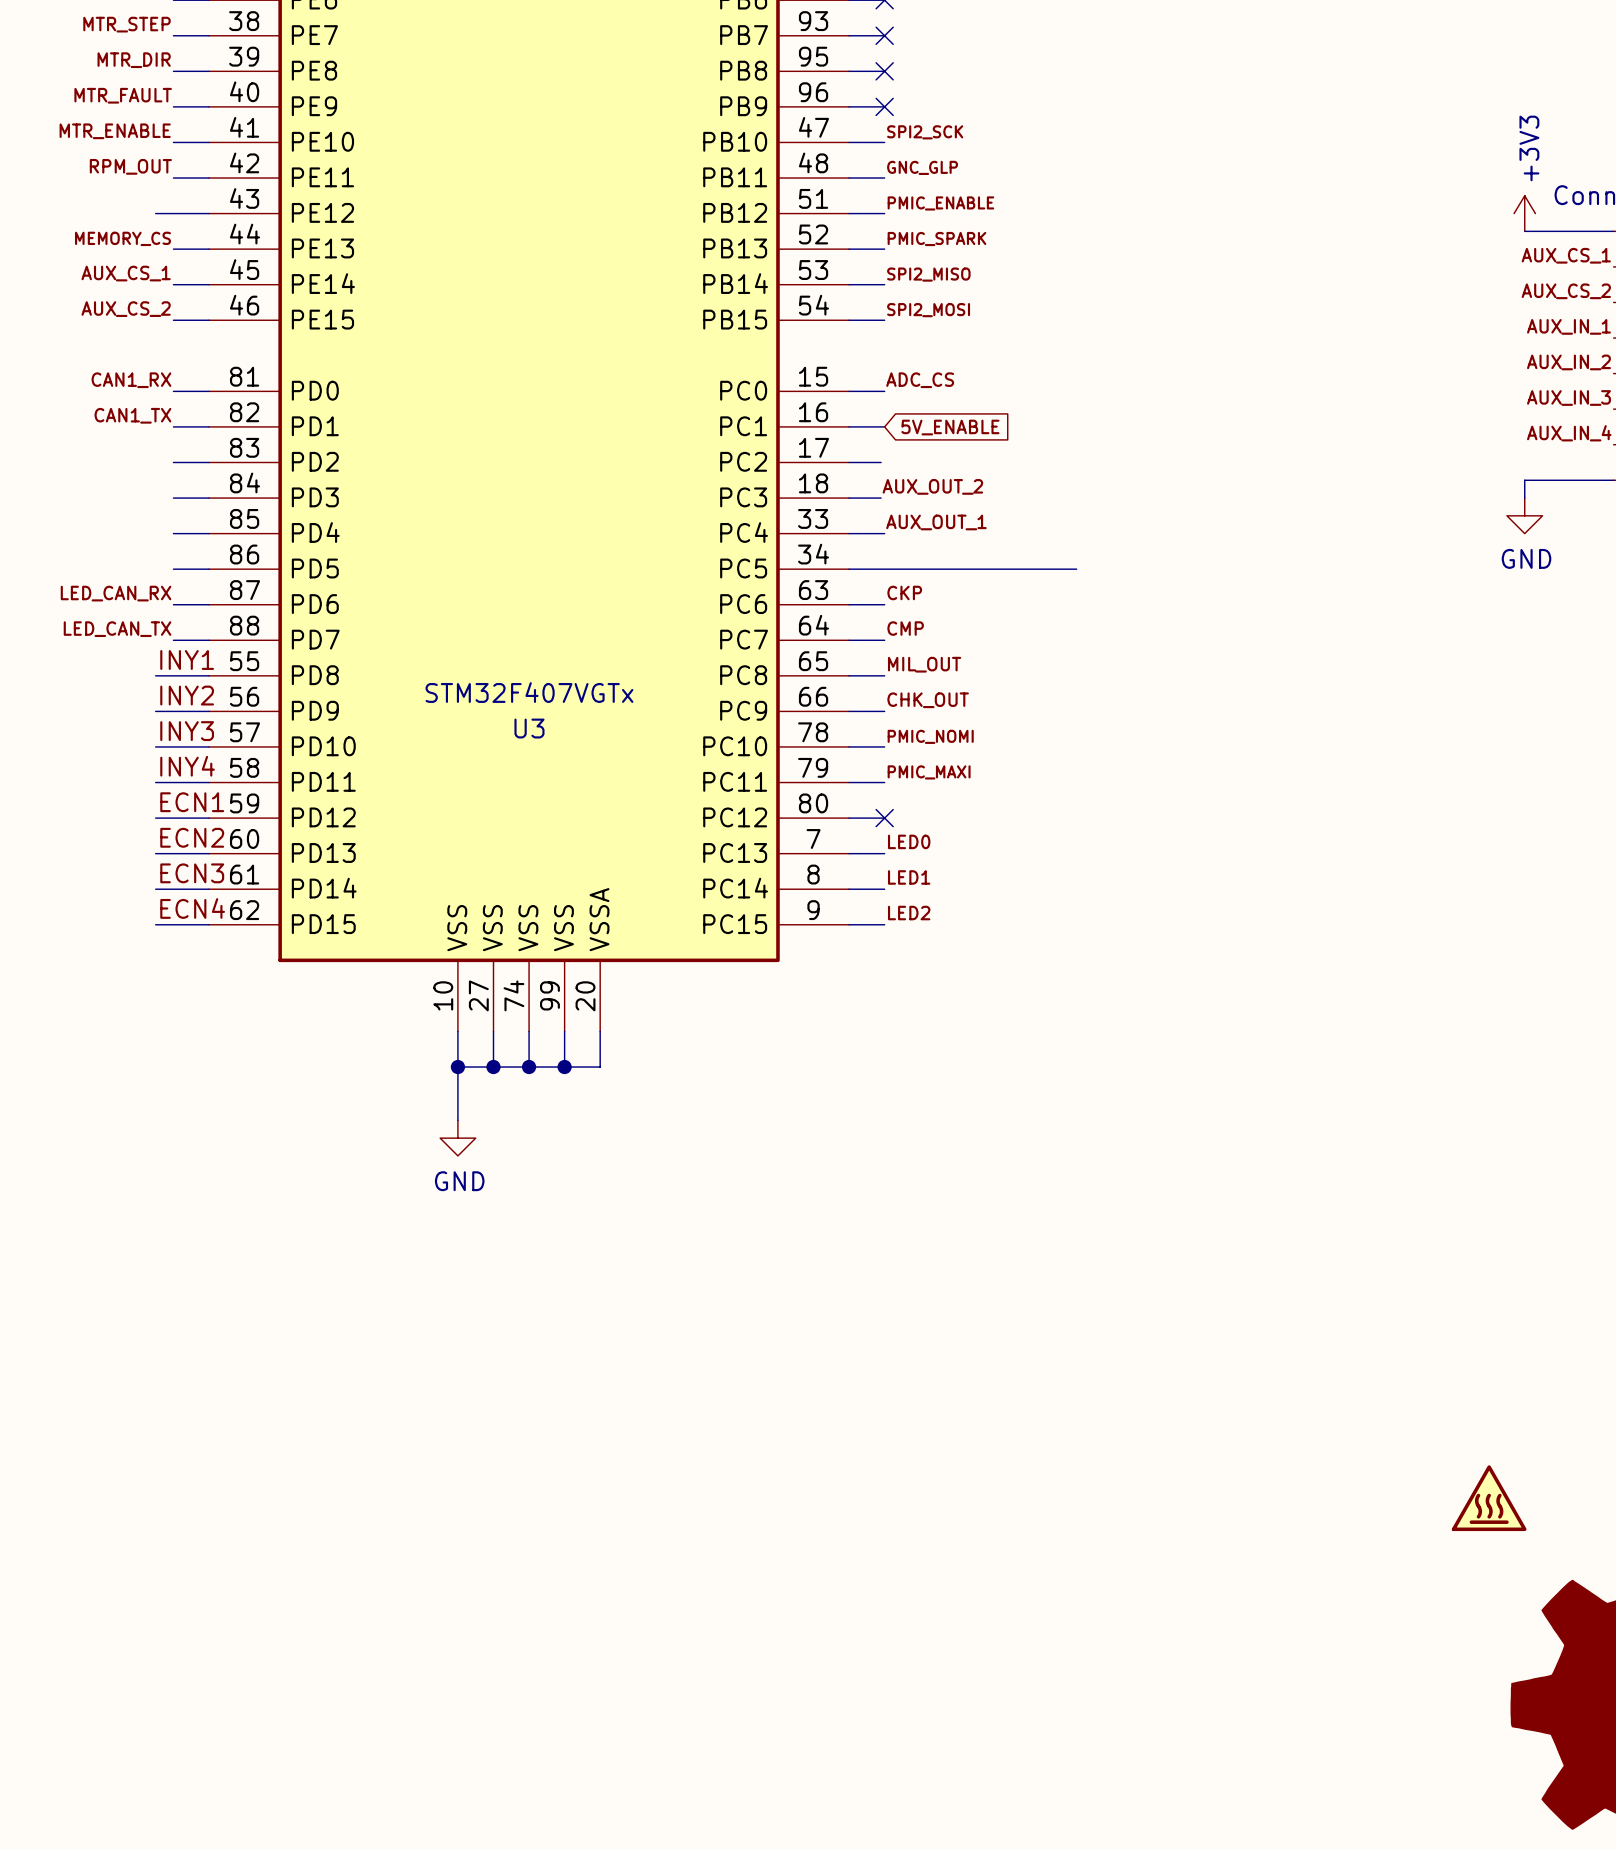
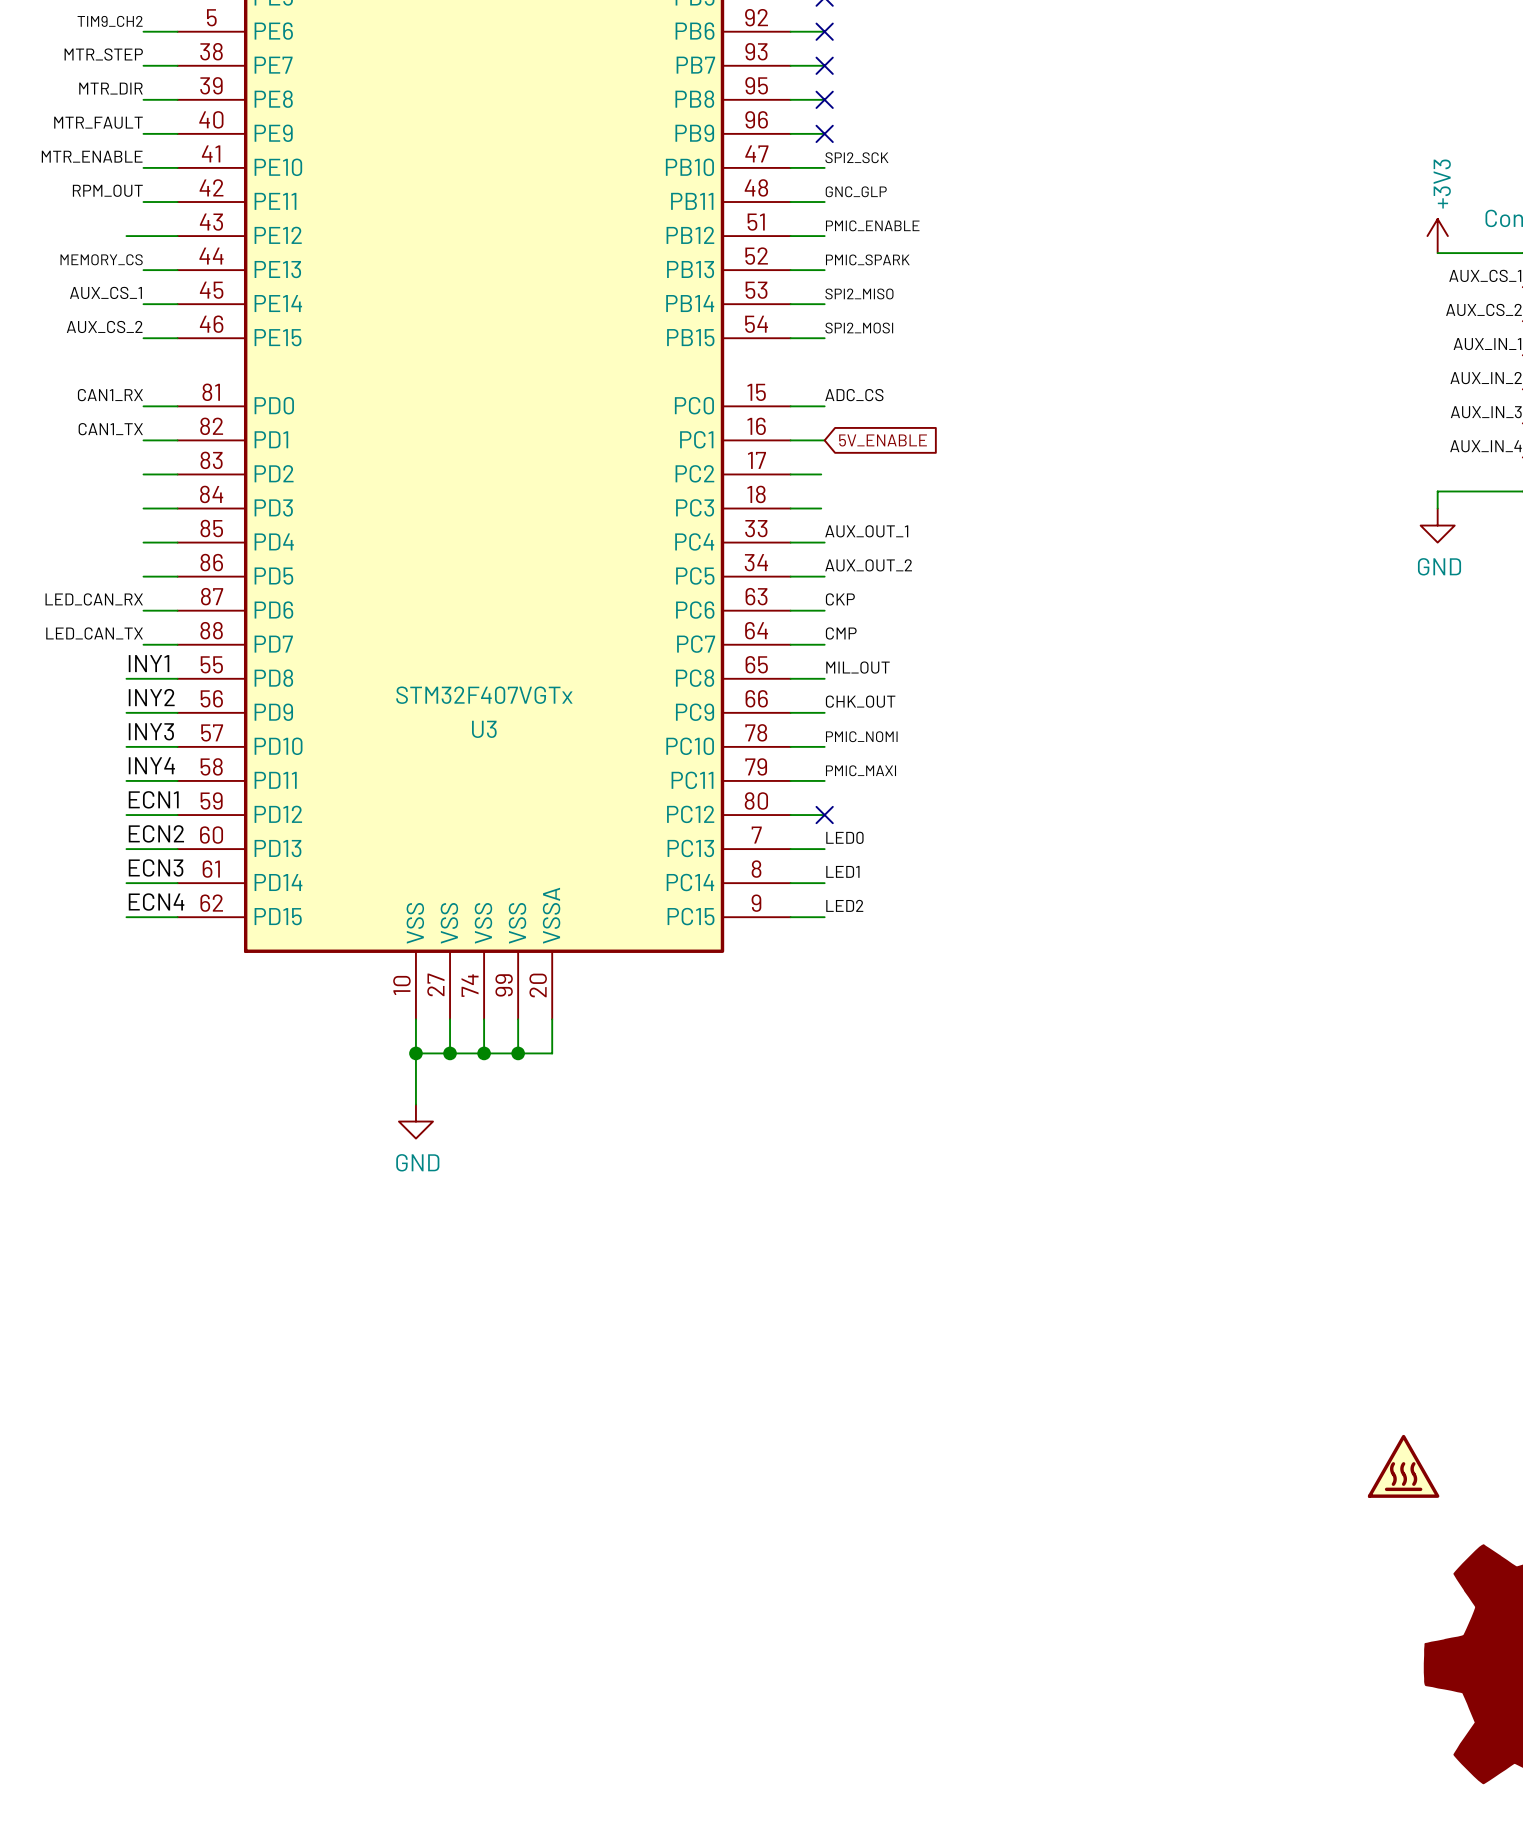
label position: AUX_OUT_2 (932, 486) -> AUX_OUT_2 (868, 565)
wire: (884, 569) (1076, 569) -> none

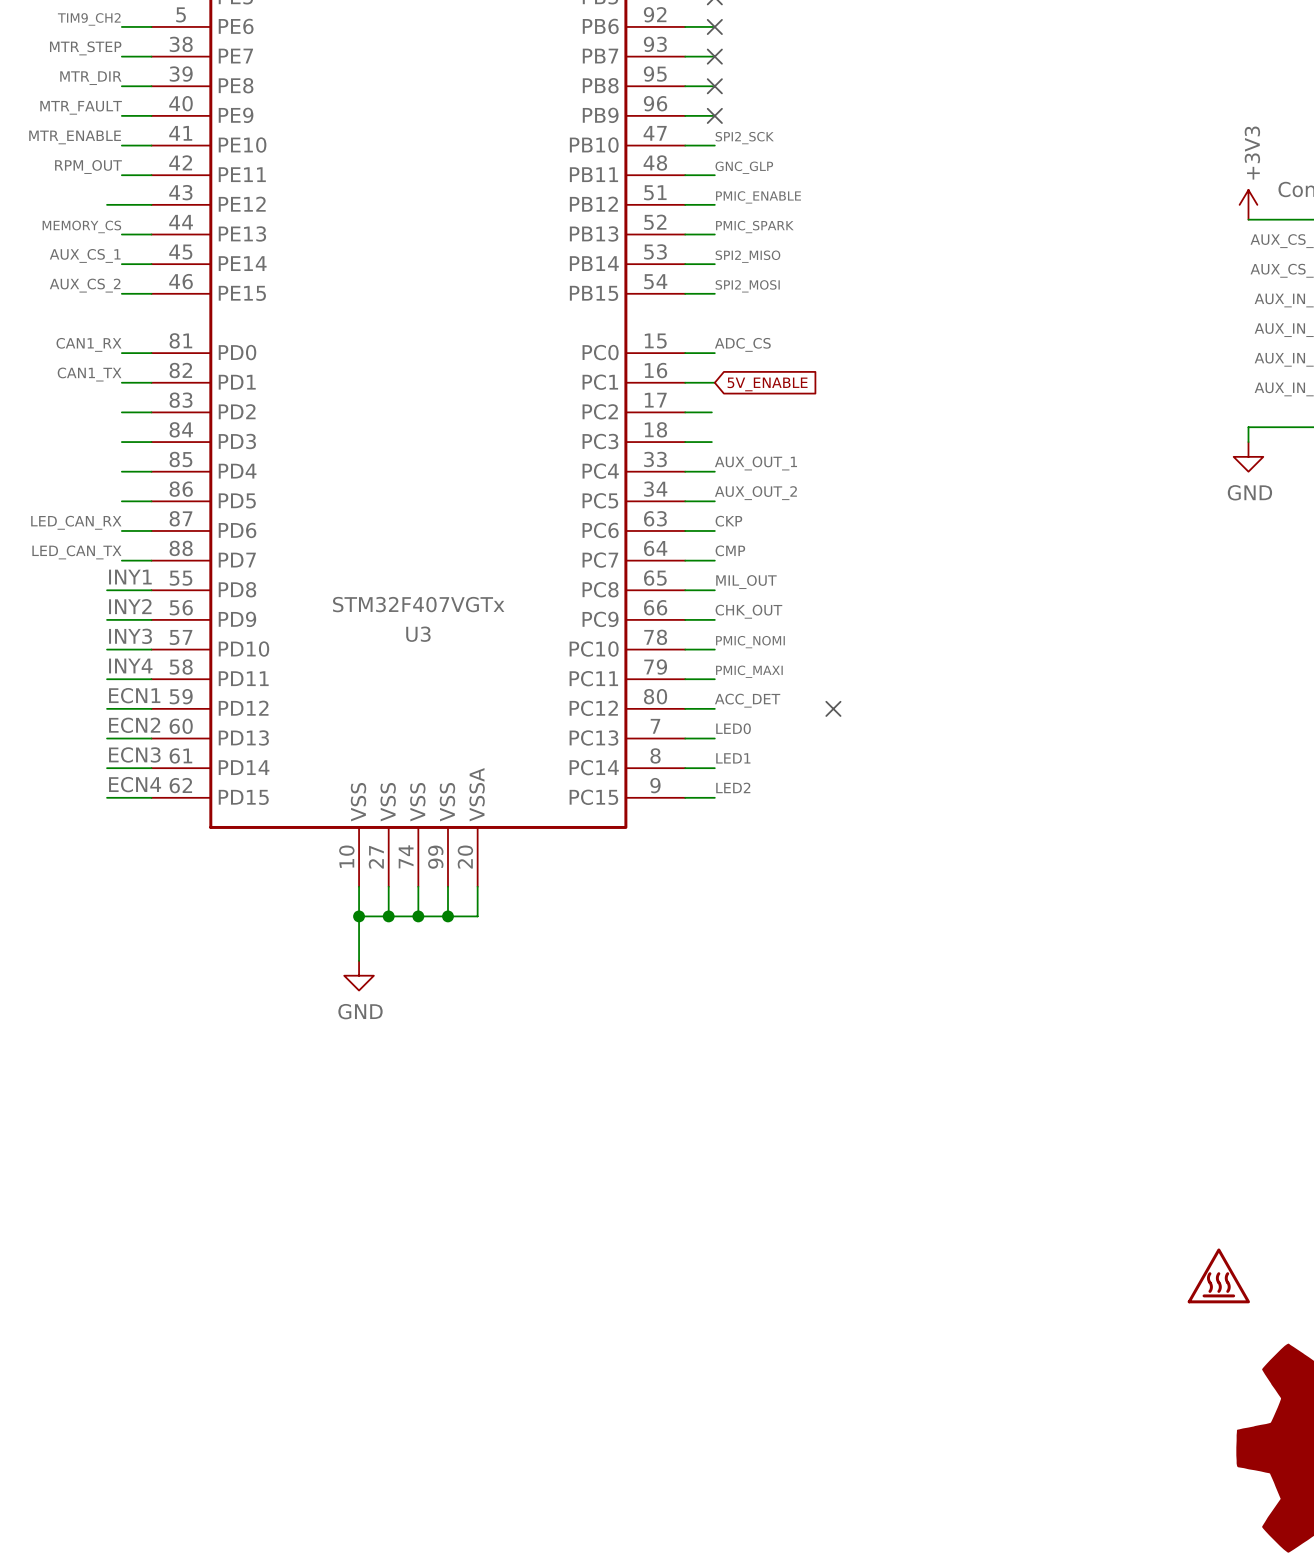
label: none -> ACC_DET (747, 700)
no-connect mark: (824, 815) -> none
no-connect mark: none -> (833, 708)

